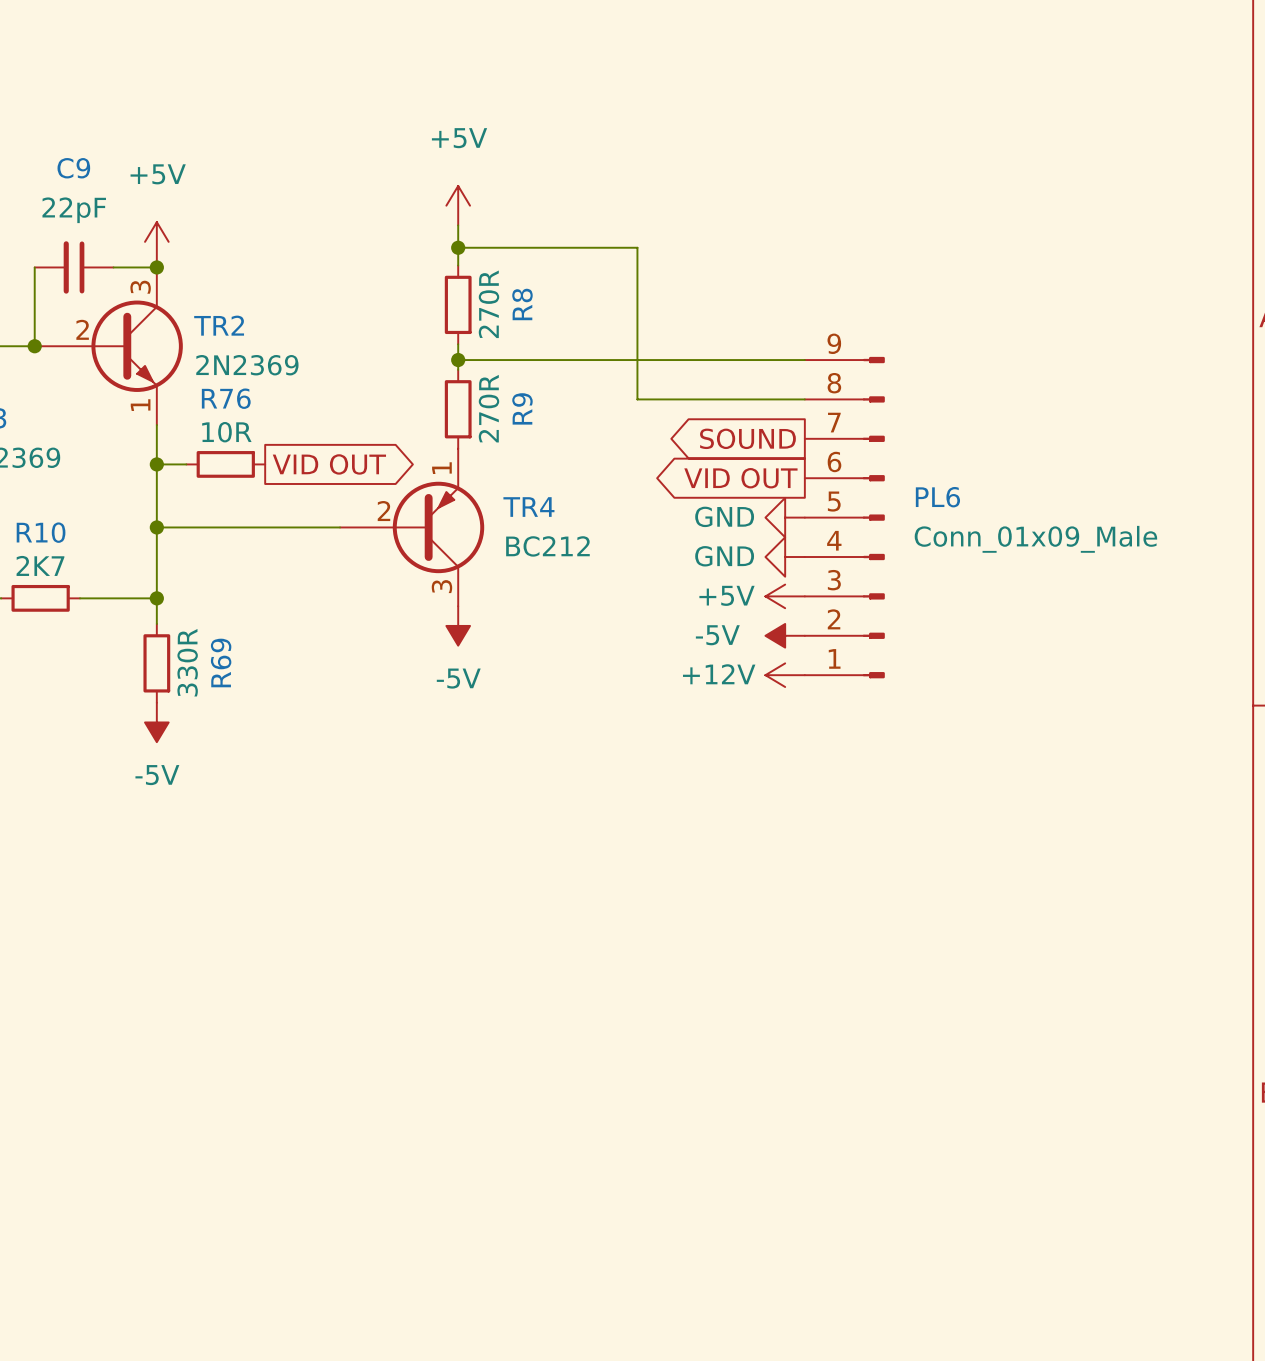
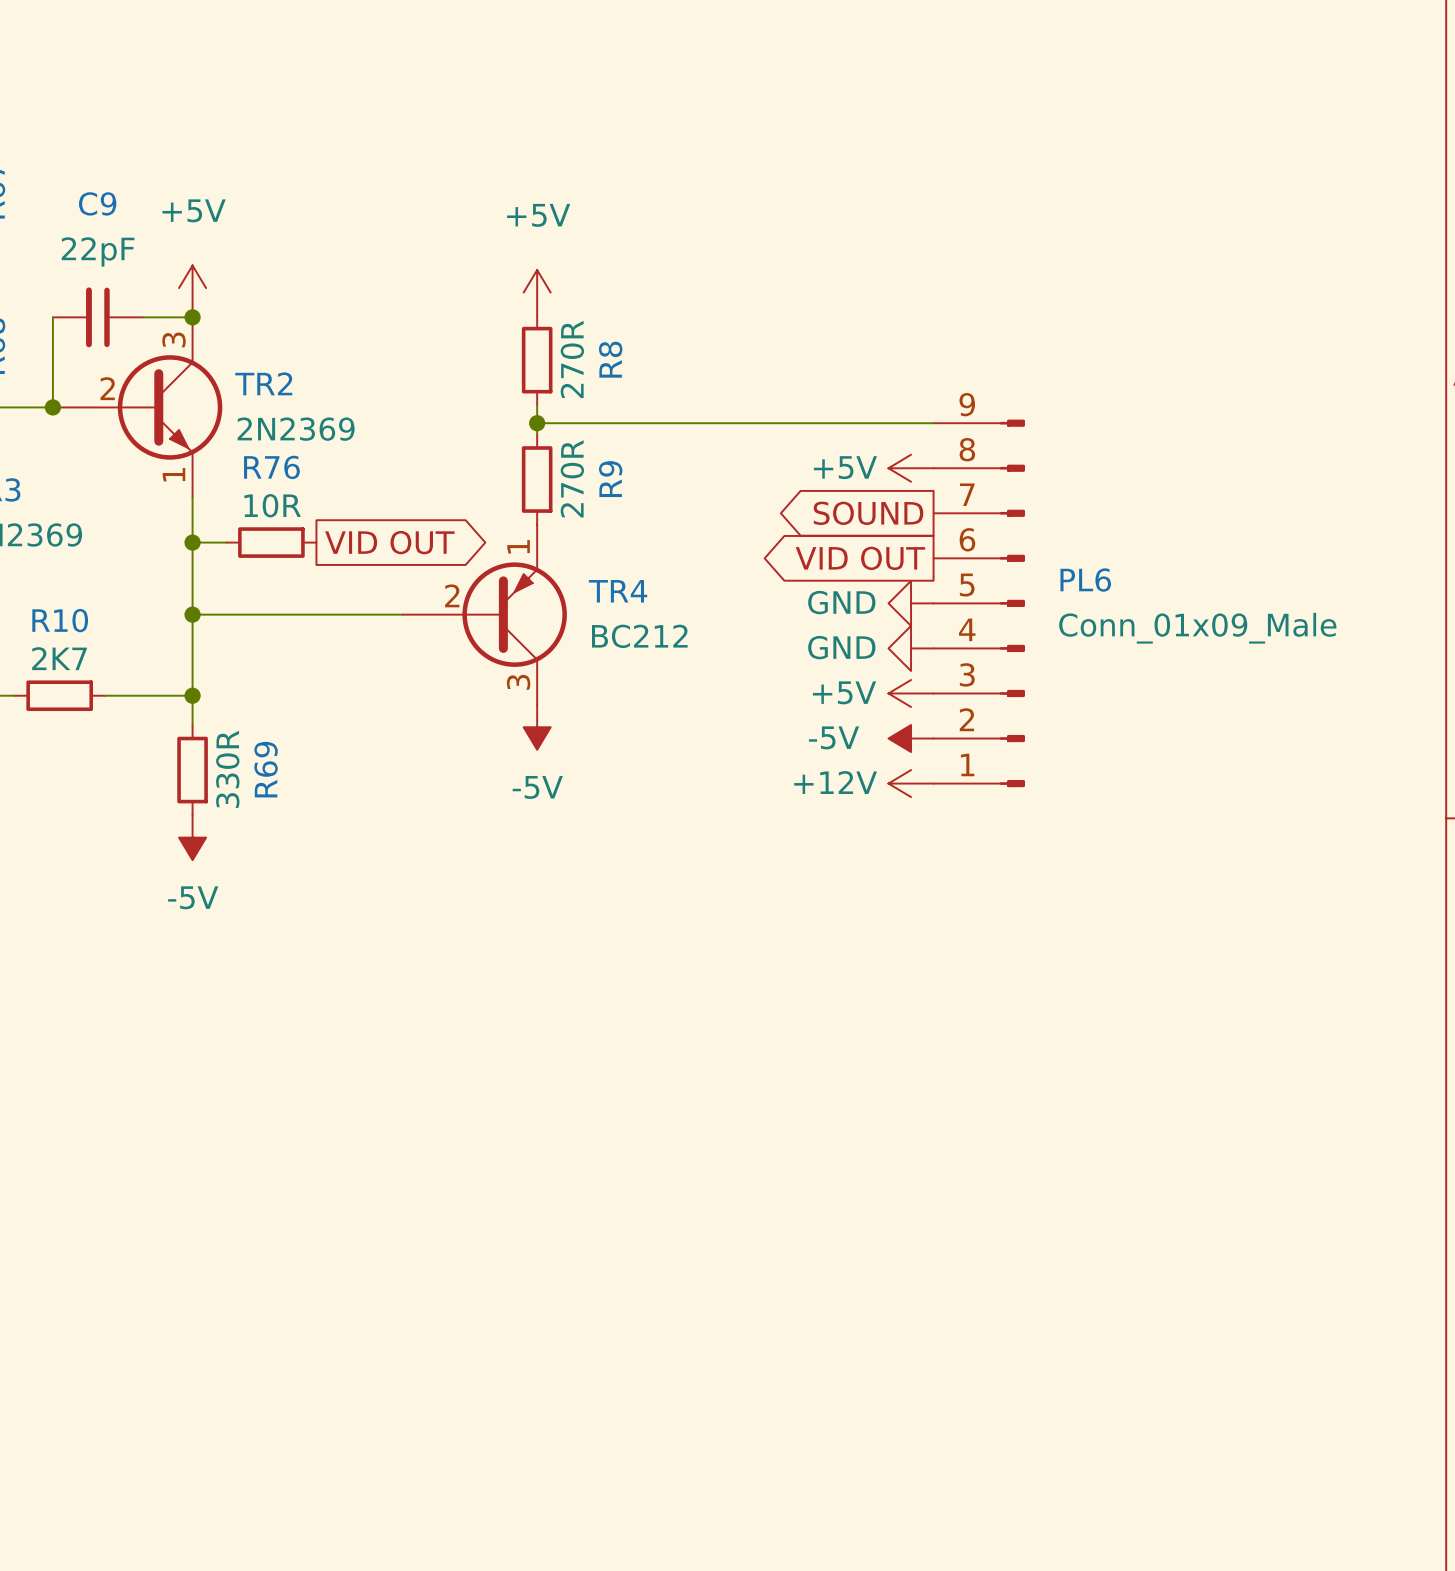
power symbol position: +5V (458, 205) -> +5V (537, 292)
wire: (458, 247) (637, 247) (637, 399) (804, 399) -> none
junction: (458, 247) -> none
power symbol: none -> +5V (911, 468)

